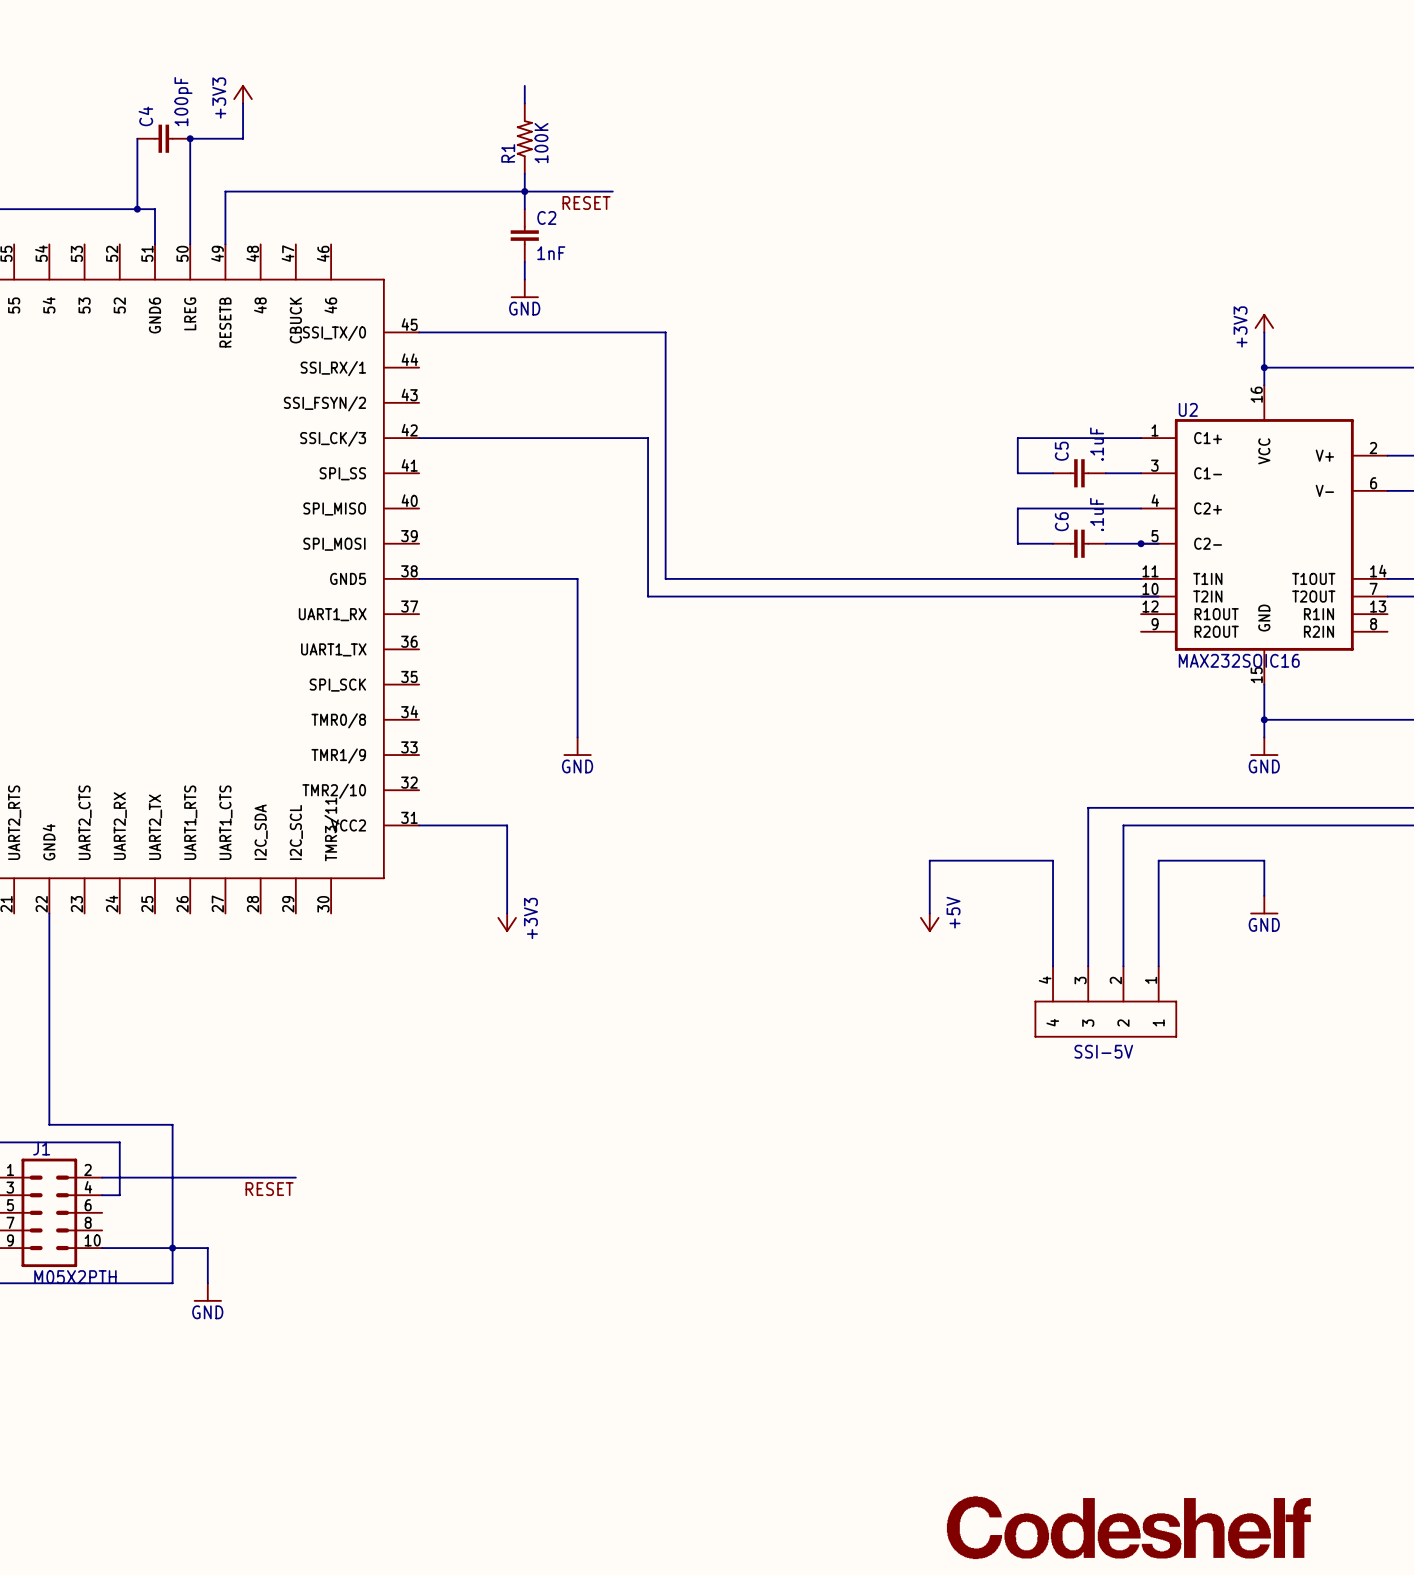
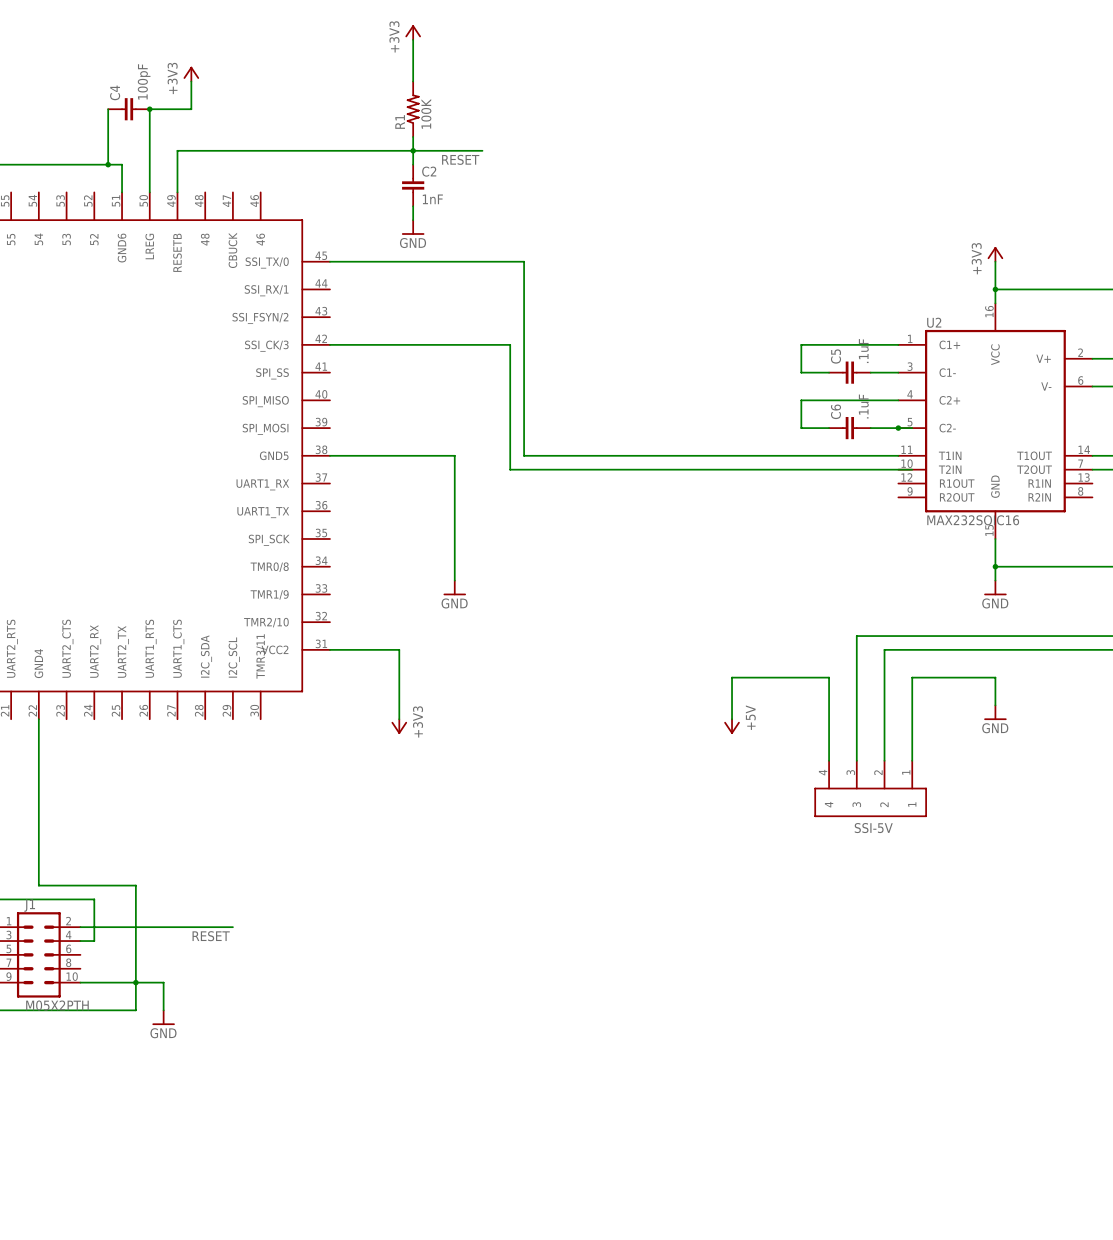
power symbol: none -> +3V3 (413, 32)
wire: none -> (413, 39) (413, 67)
part: (1128, 1527) -> none

